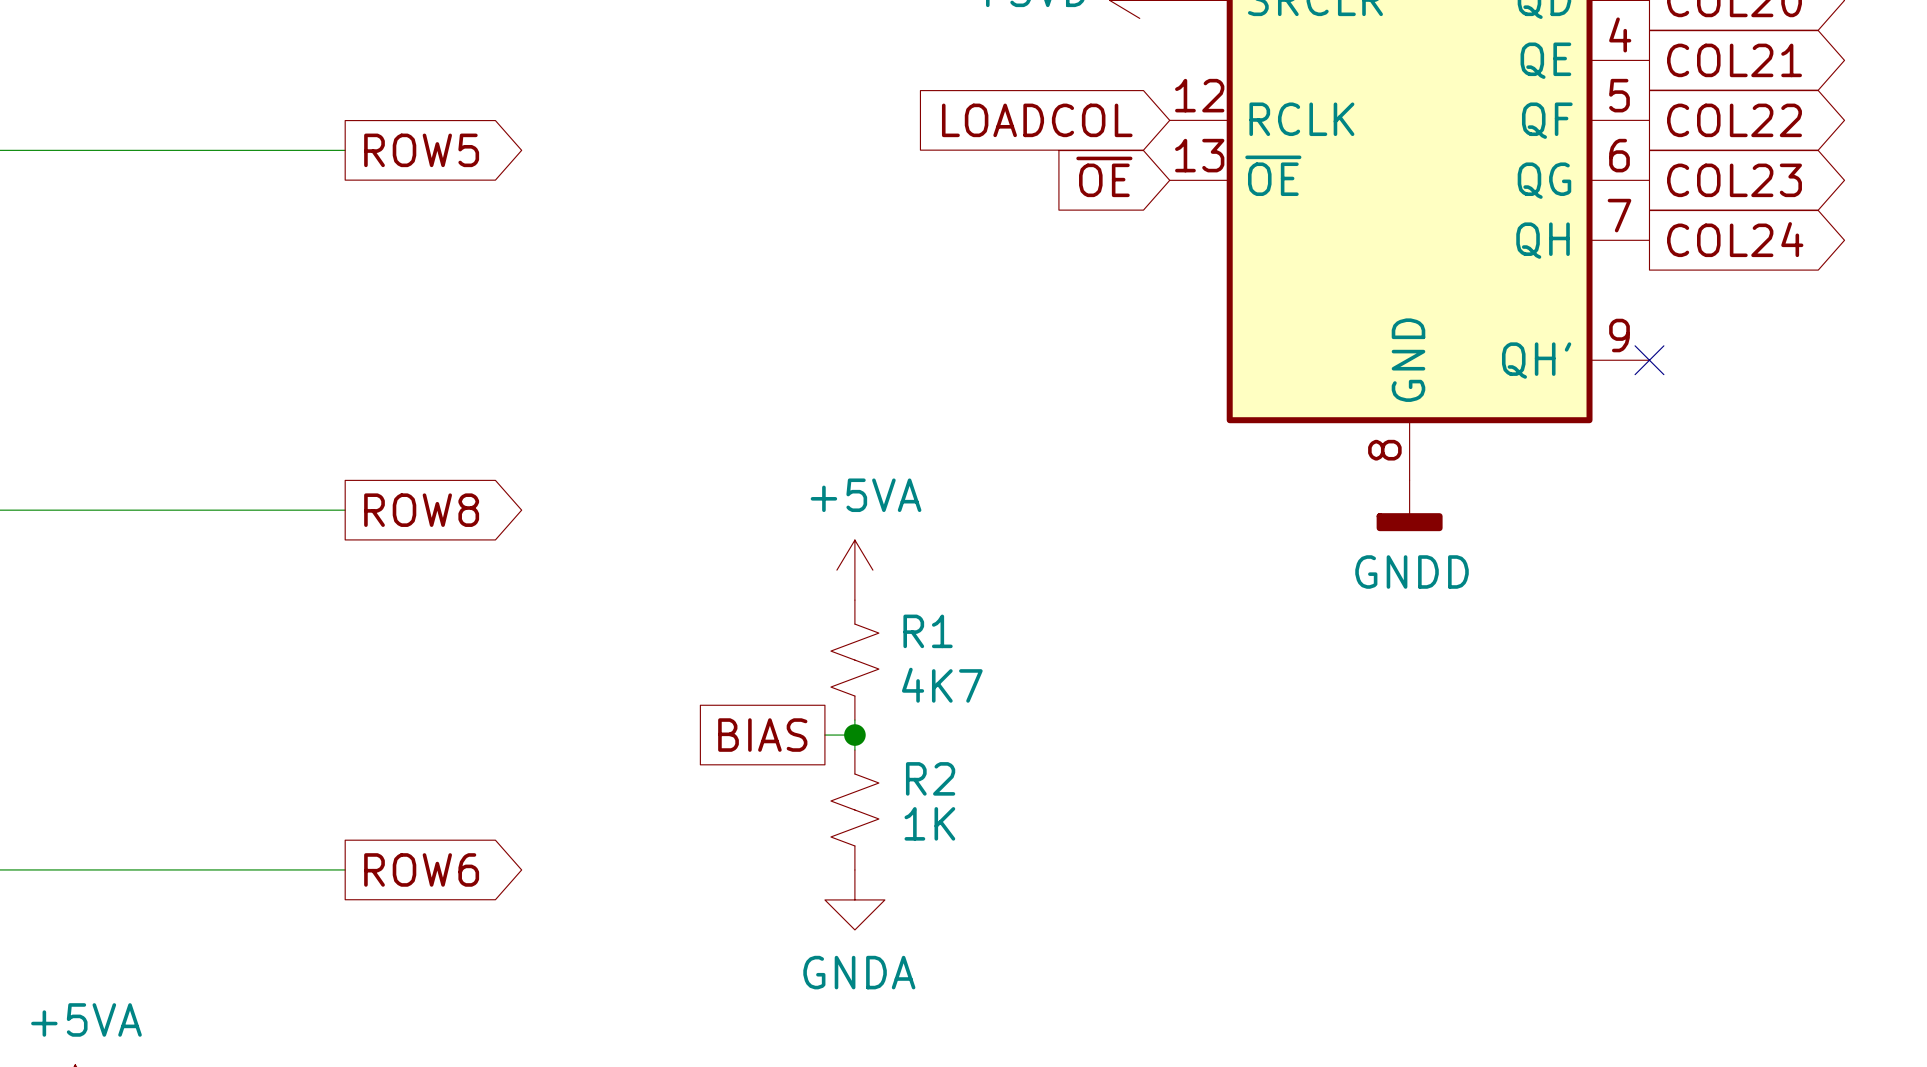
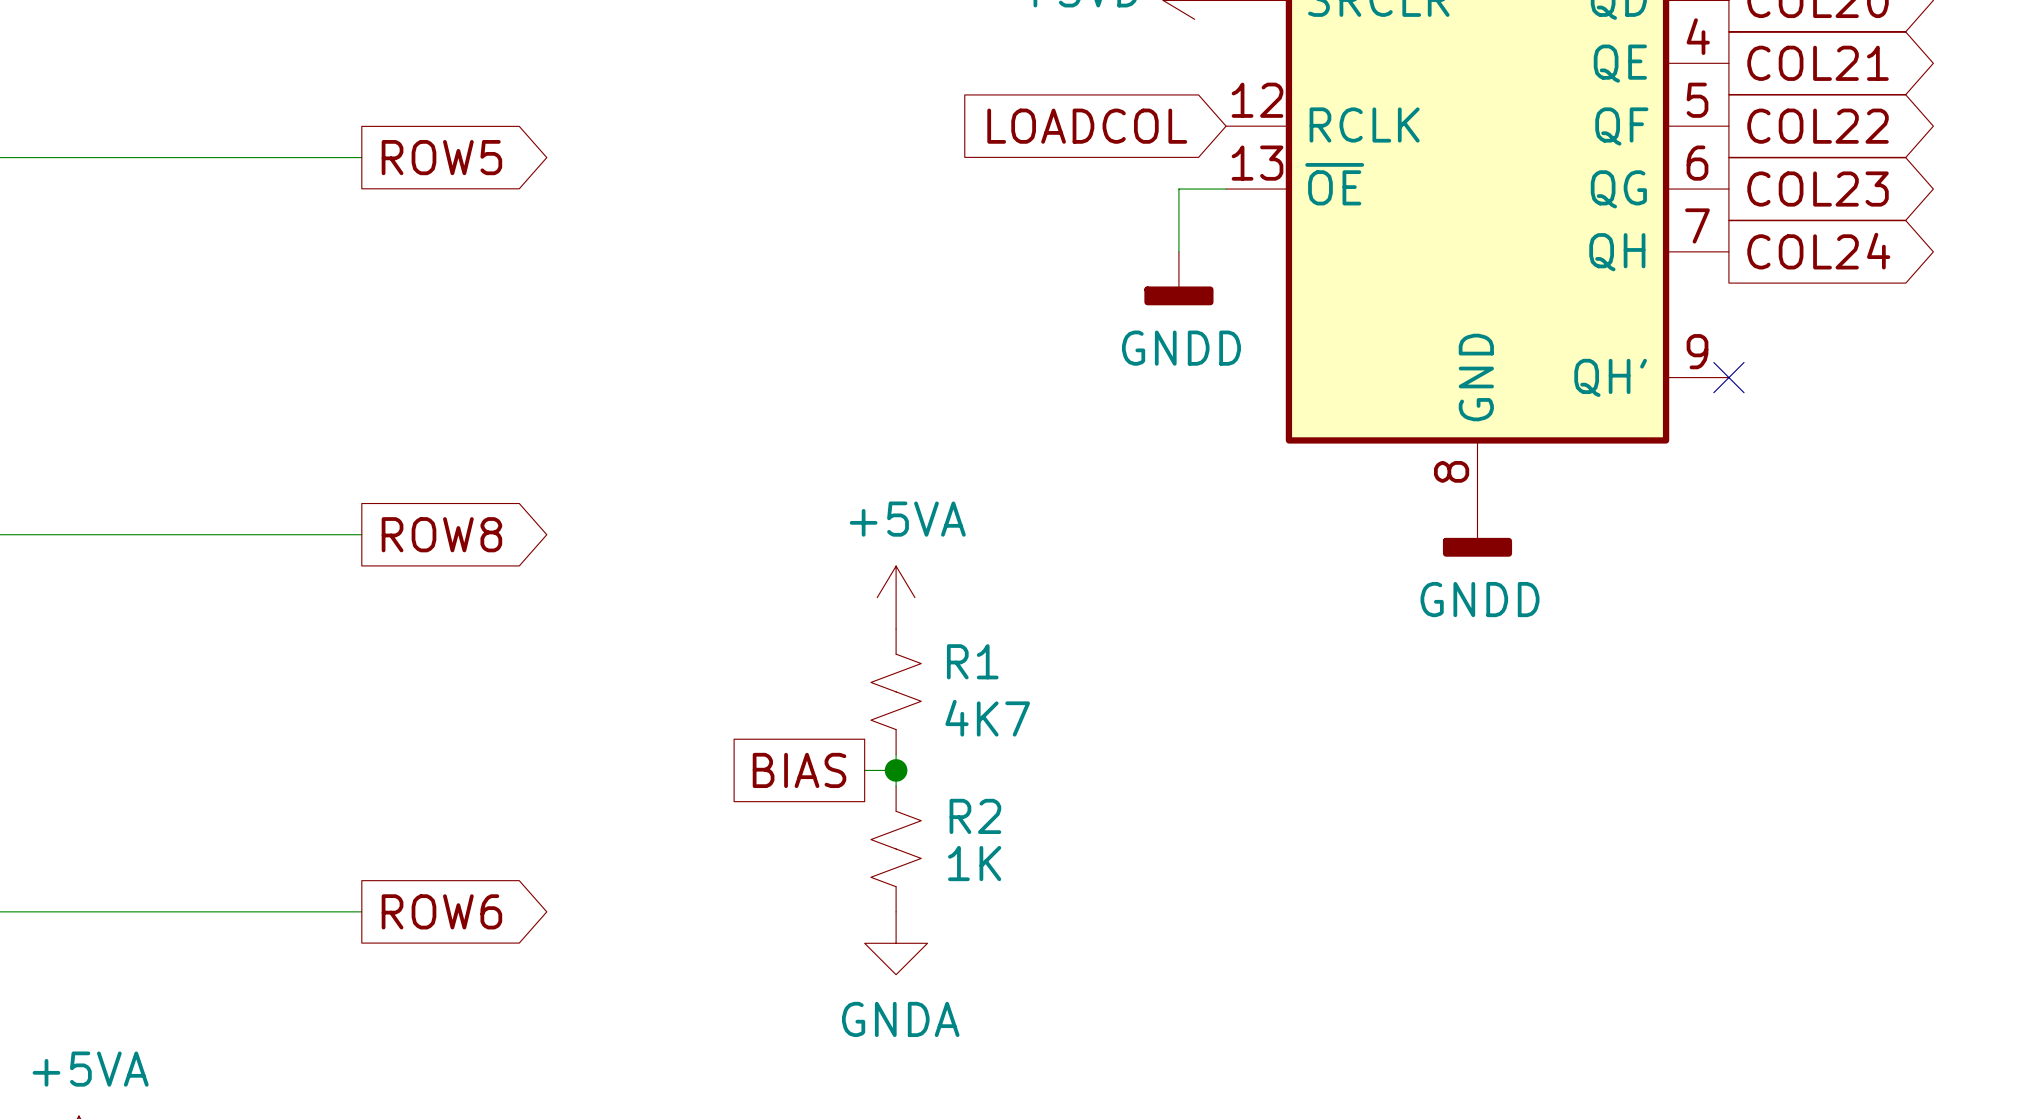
global label: ~{OE} (1104, 176) -> none
wire: none -> (1226, 189) (1178, 189) (1178, 251)
power symbol: none -> GNDD (1178, 278)

